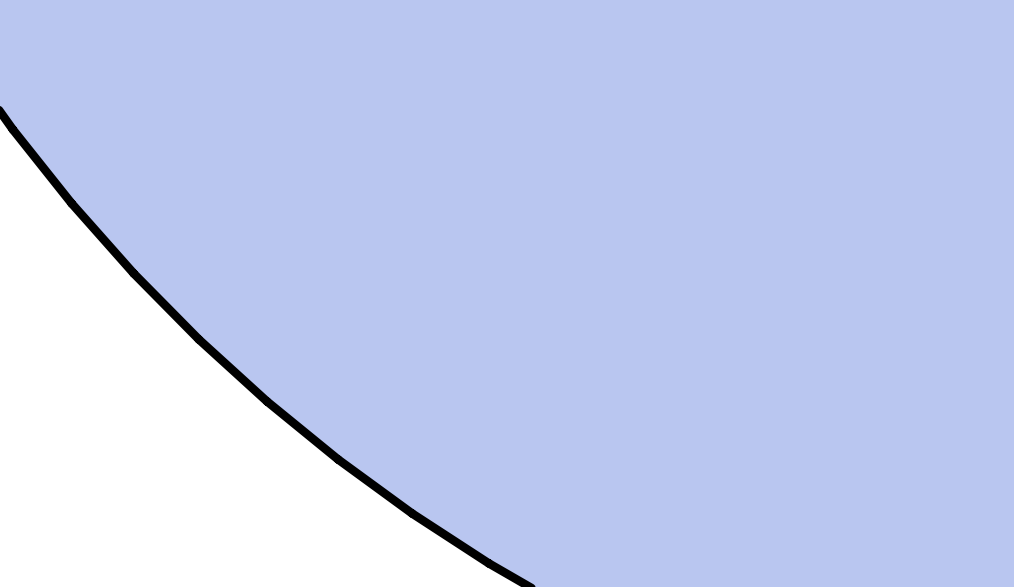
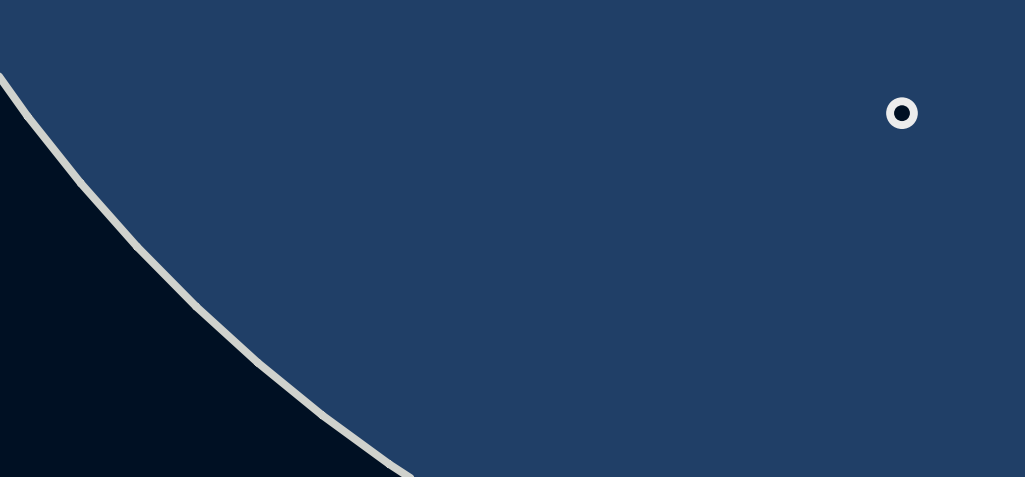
via: none -> (901, 113)

